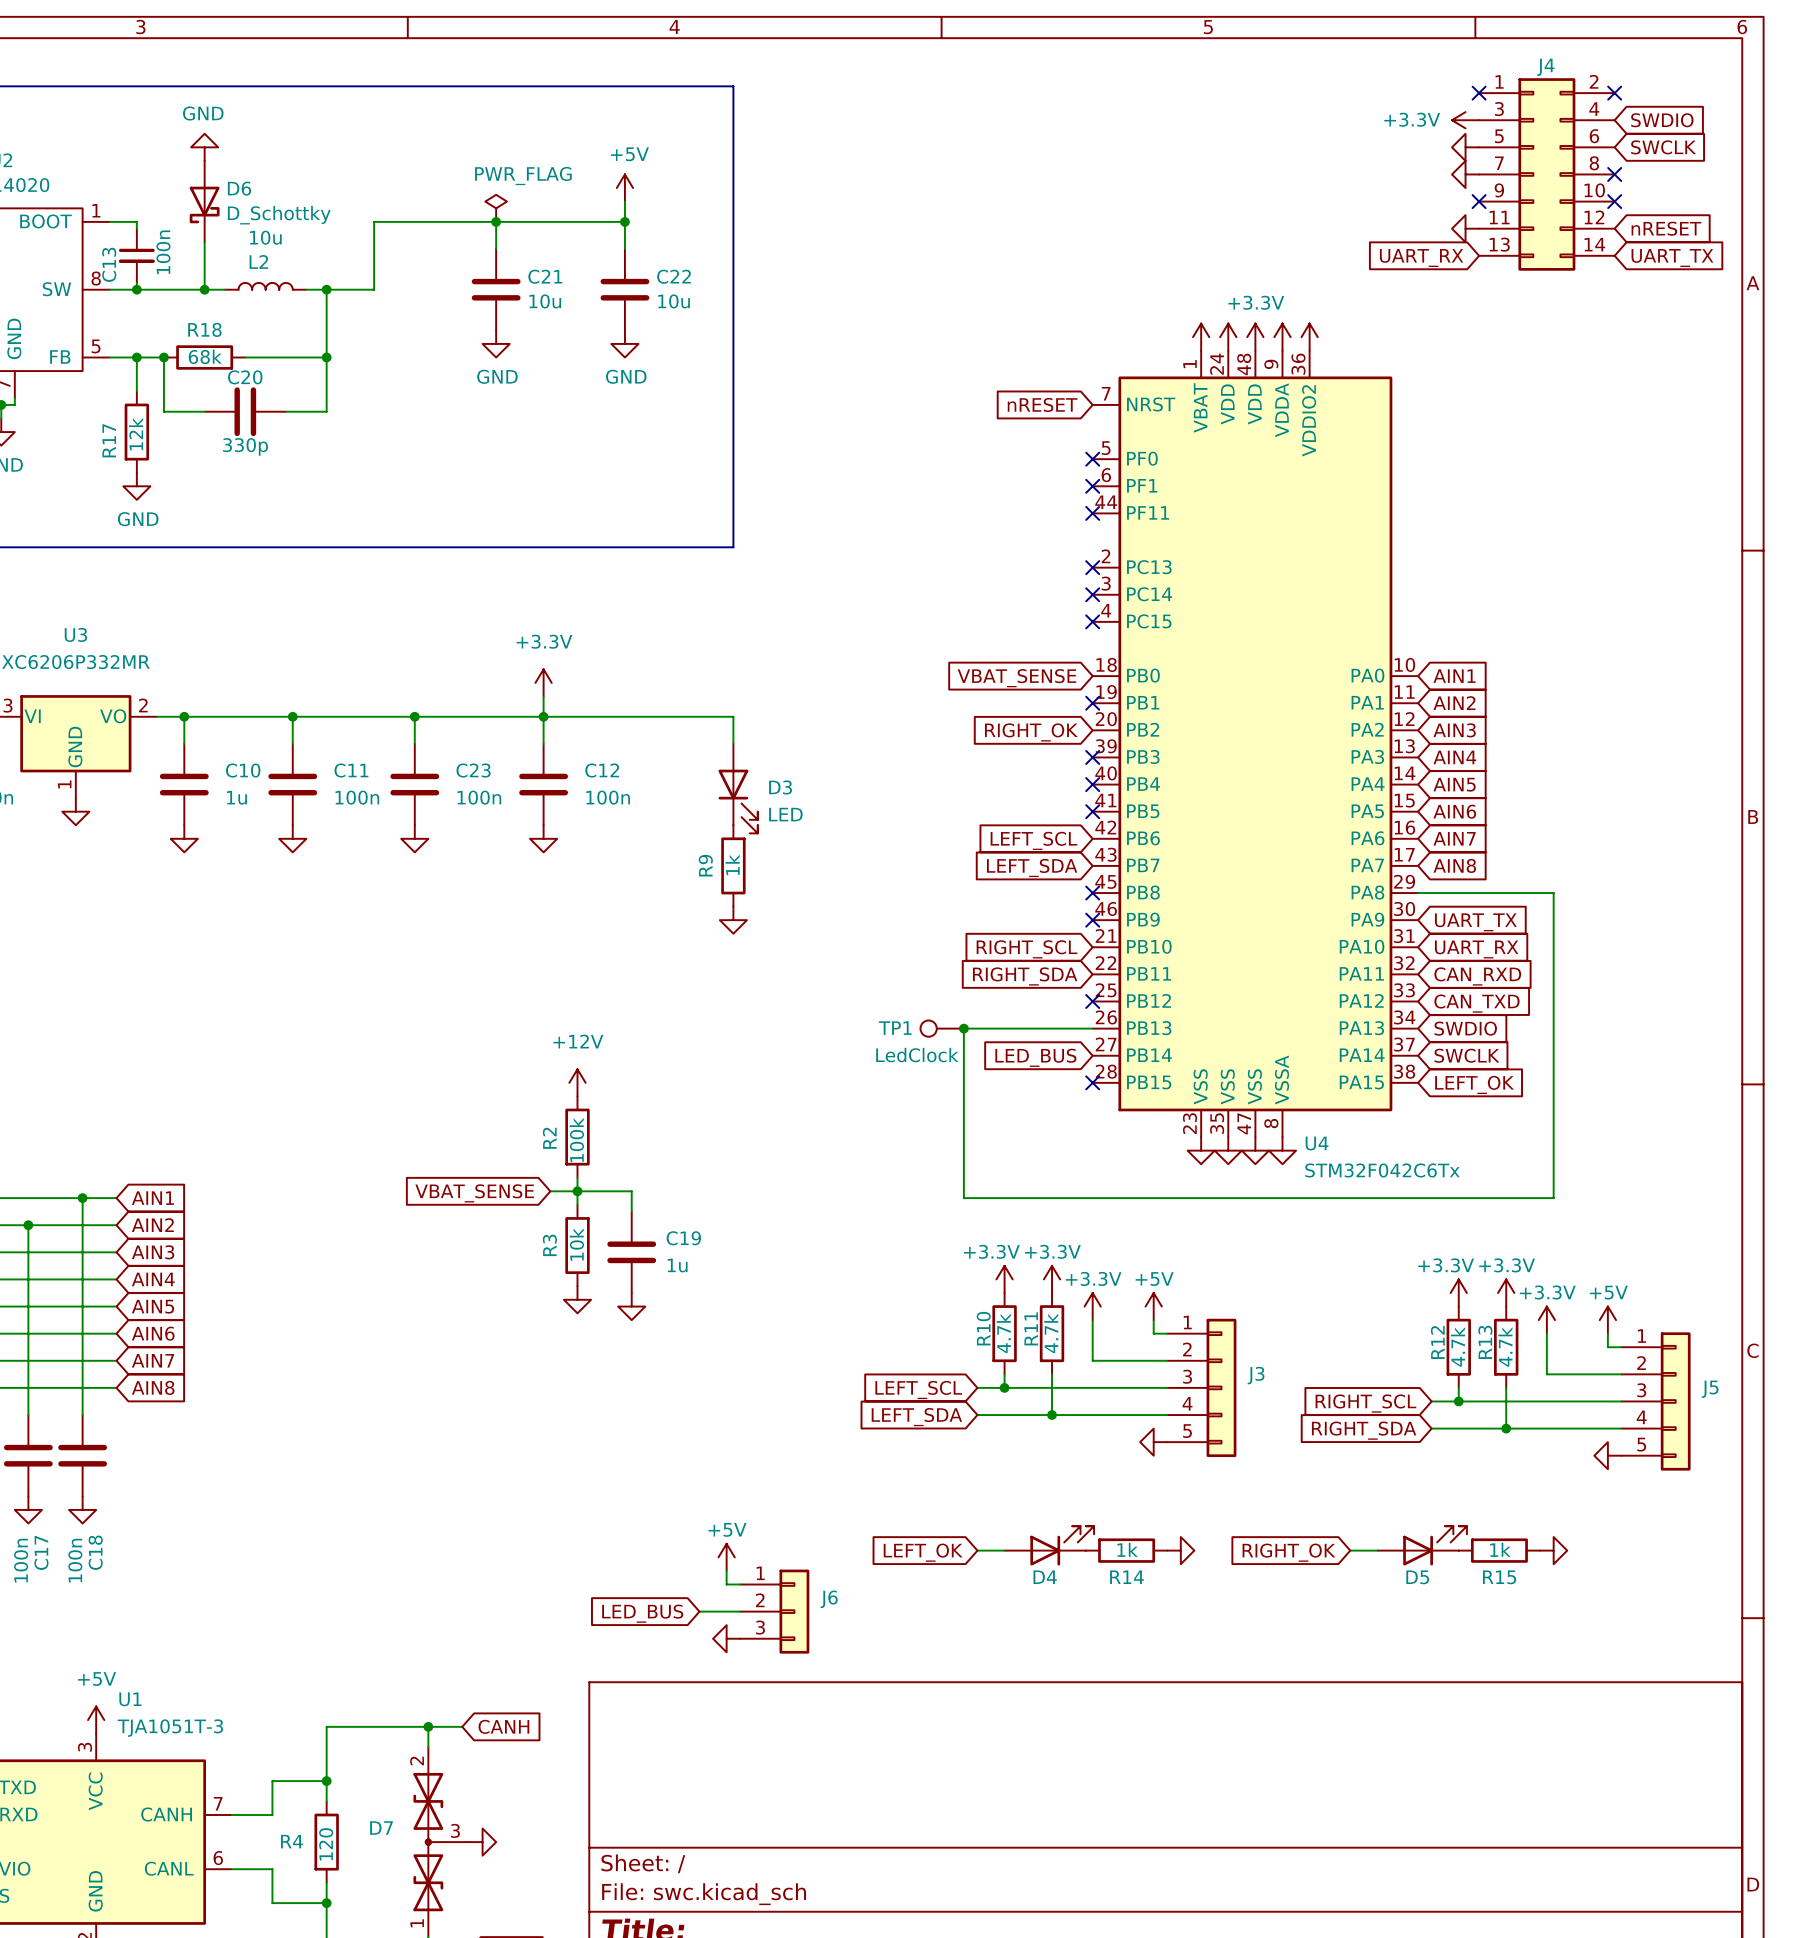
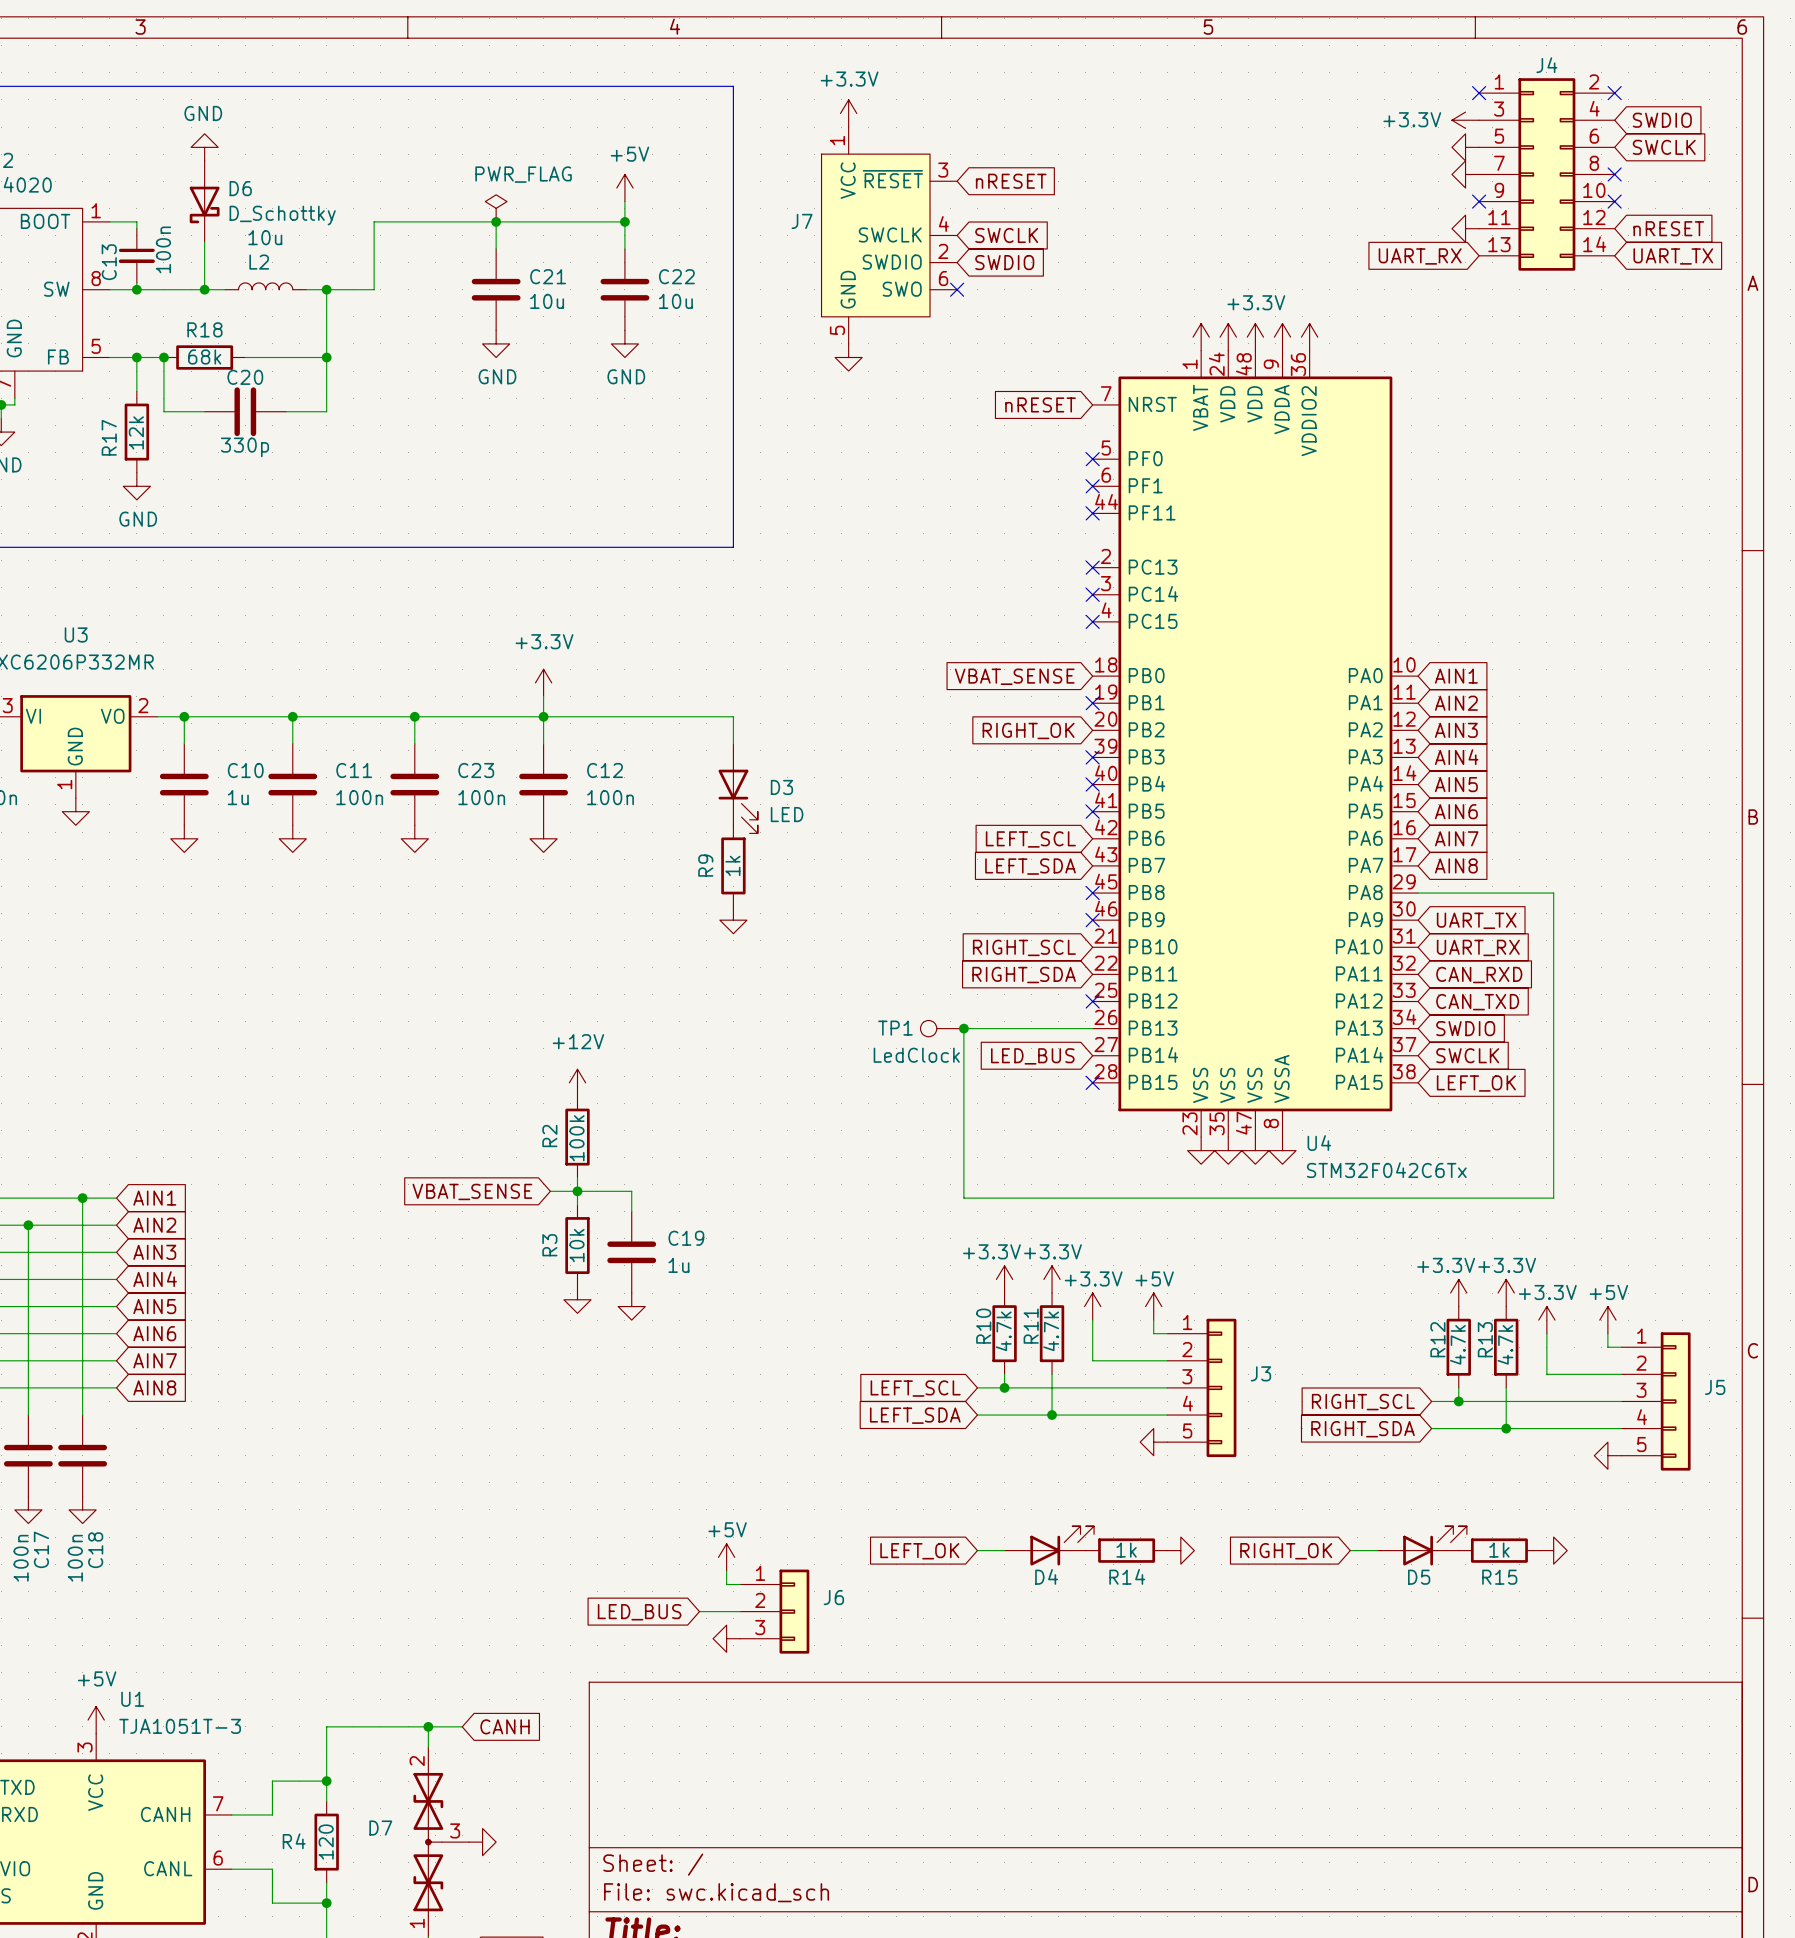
power symbol: none -> +3.3V (848, 113)
global label: none -> nRESET (1011, 181)
J7: none -> (889, 235)
global label: none -> SWCLK (1006, 235)
global label: none -> SWDIO (1004, 262)
no-connect mark: none -> (957, 289)
power symbol: none -> (848, 357)

